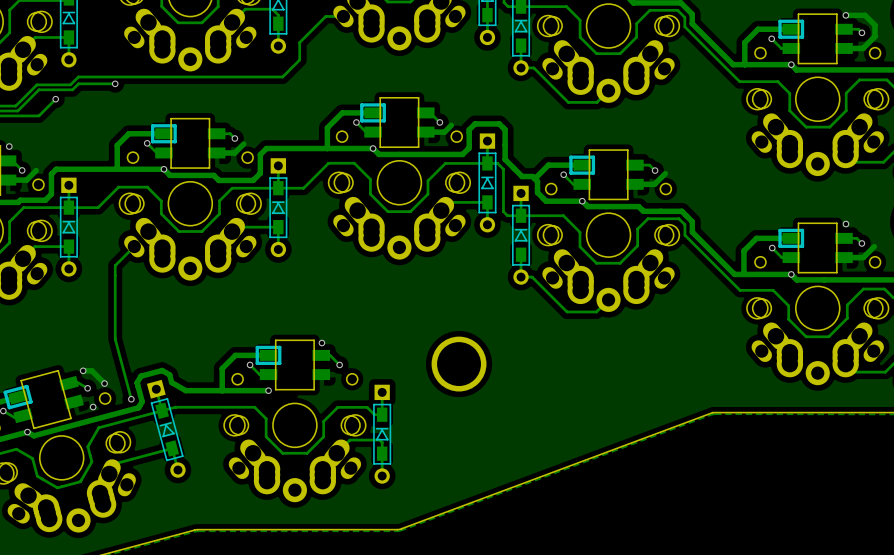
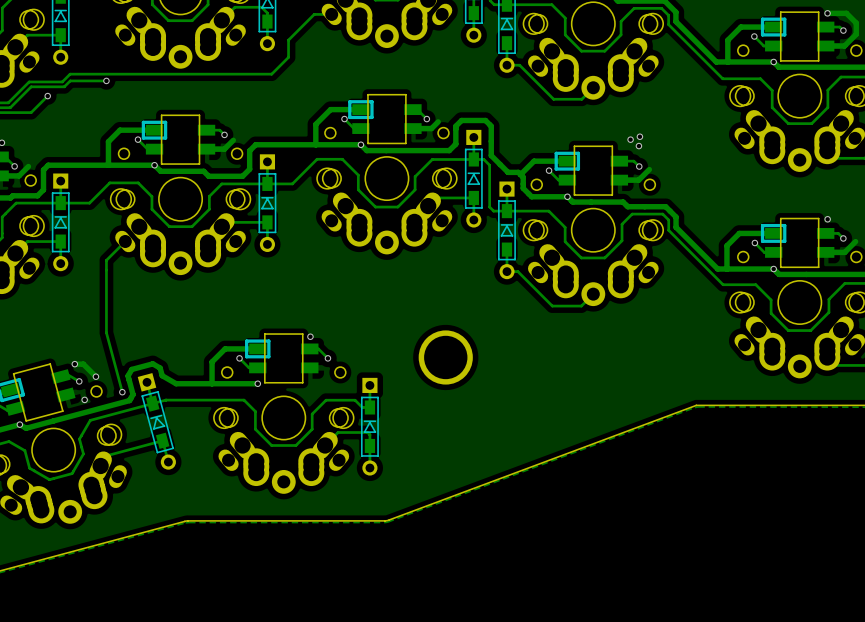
via: none -> (639, 136)
via: none -> (630, 139)
via: none -> (638, 146)

